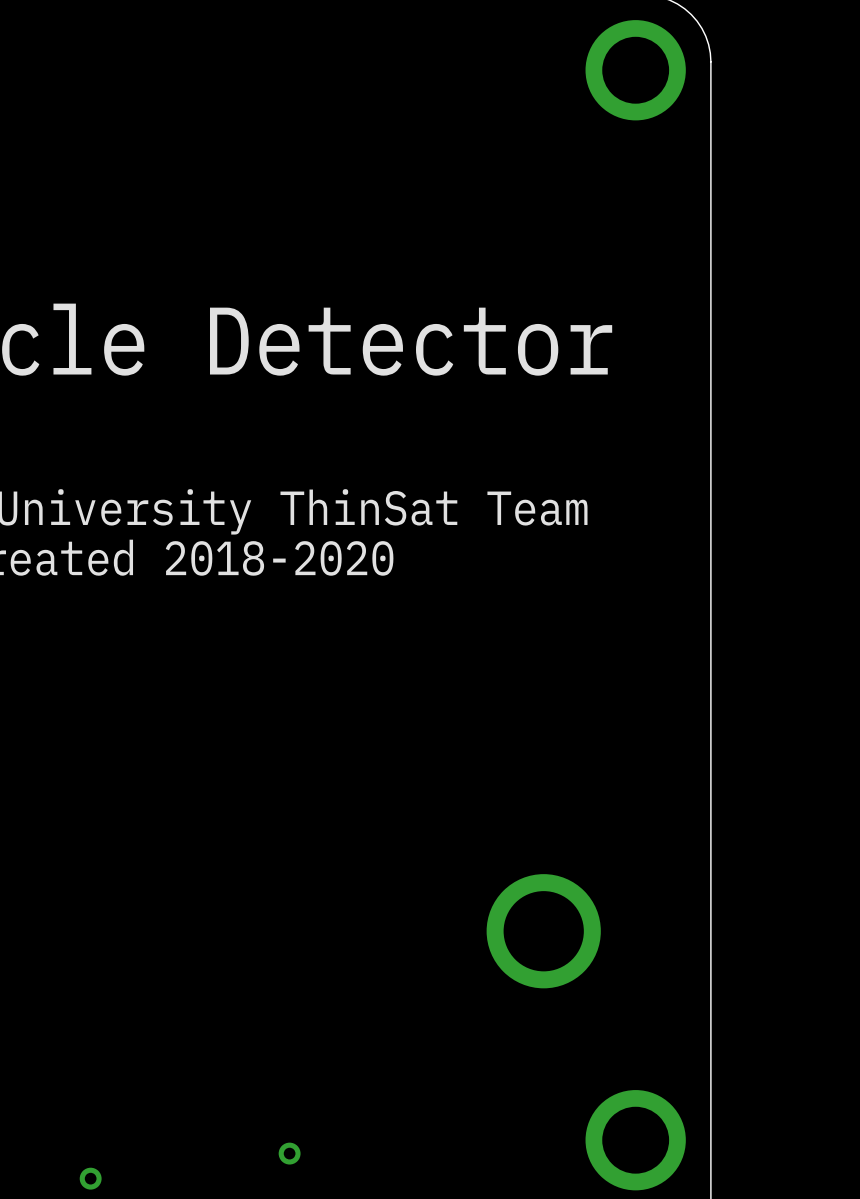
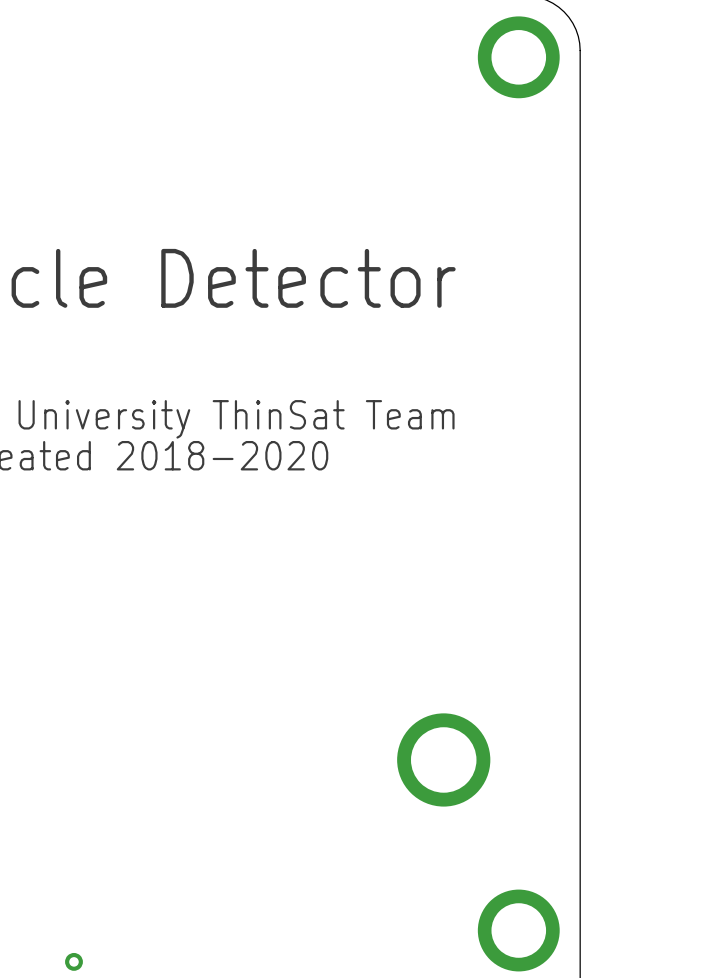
via: (289, 1153) -> none

